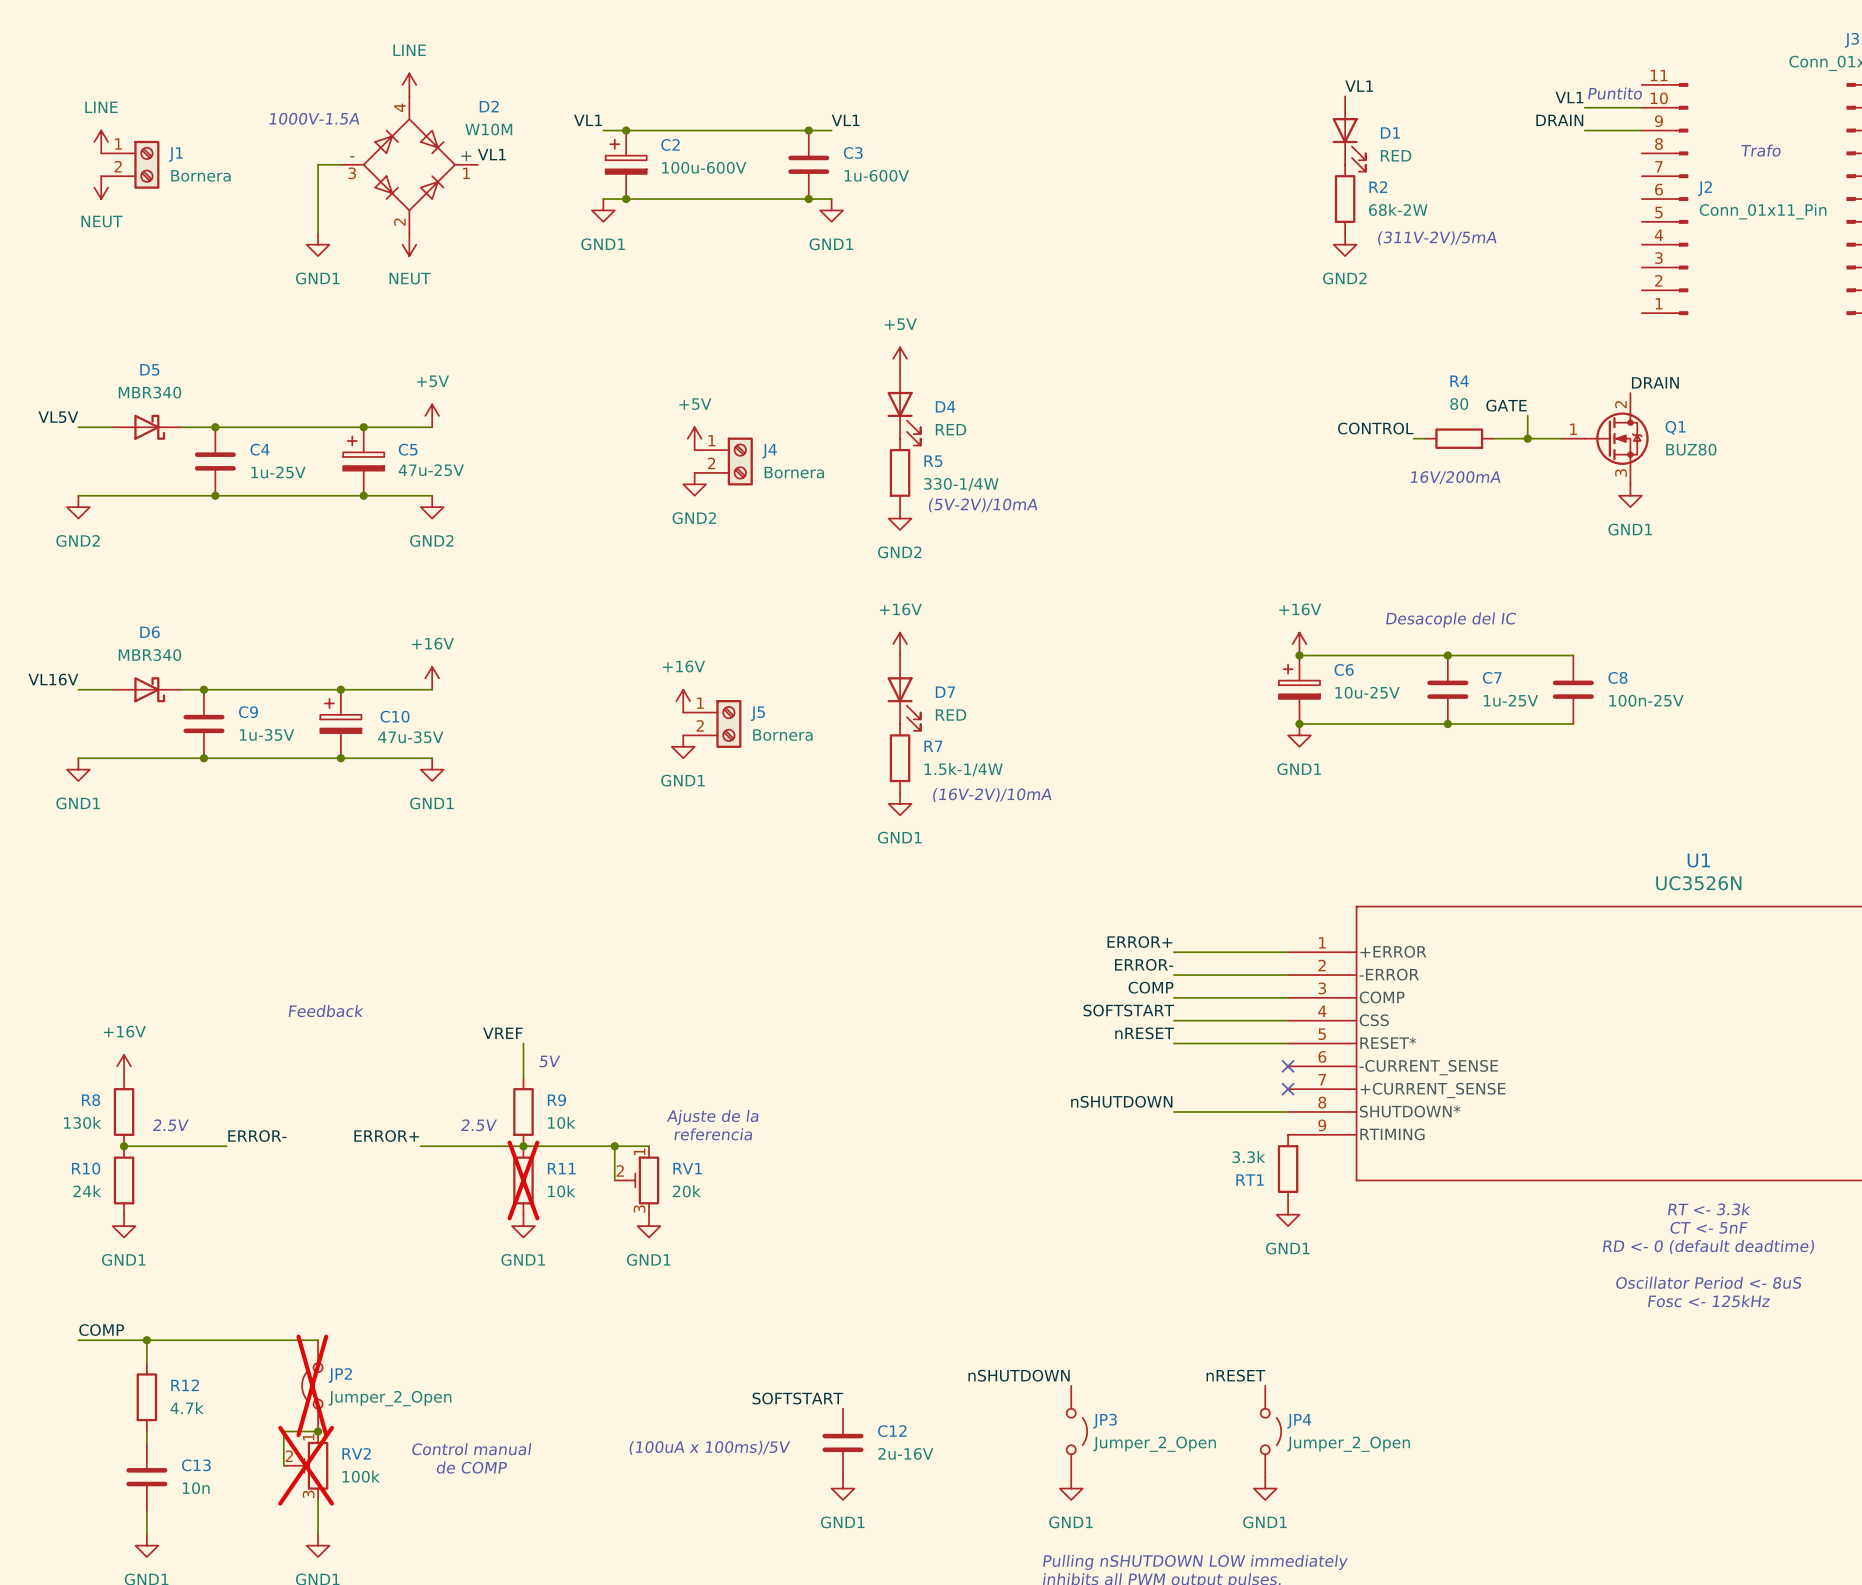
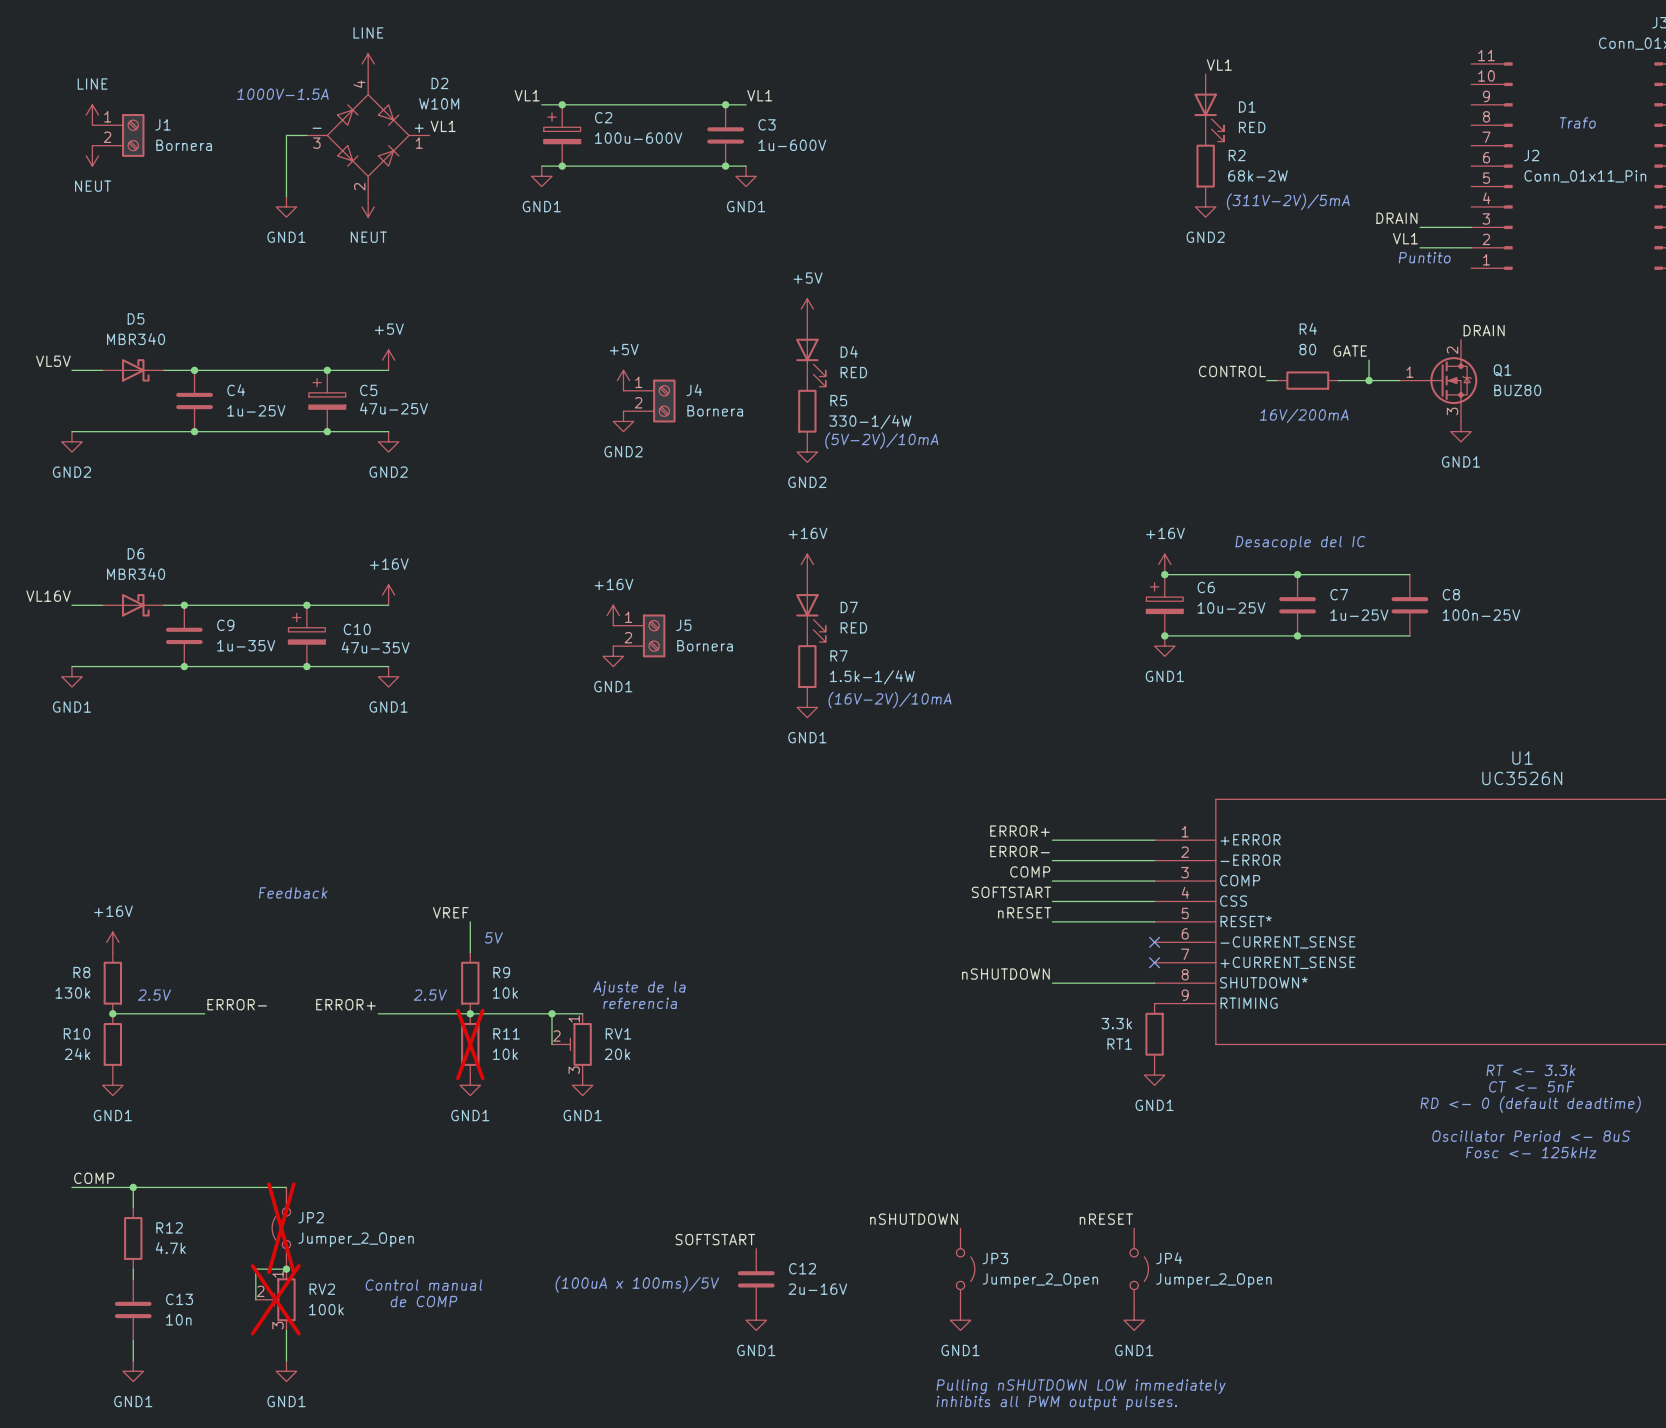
text: Puntito (1615, 93) -> none
label position: VL1 (1569, 97) -> VL1 (1405, 238)
wire: (1584, 107) (1641, 107) -> (1420, 247) (1471, 247)
label position: DRAIN (1559, 120) -> DRAIN (1396, 218)
wire: (1584, 130) (1641, 130) -> (1420, 227) (1471, 227)
text: none -> Puntito (1424, 257)

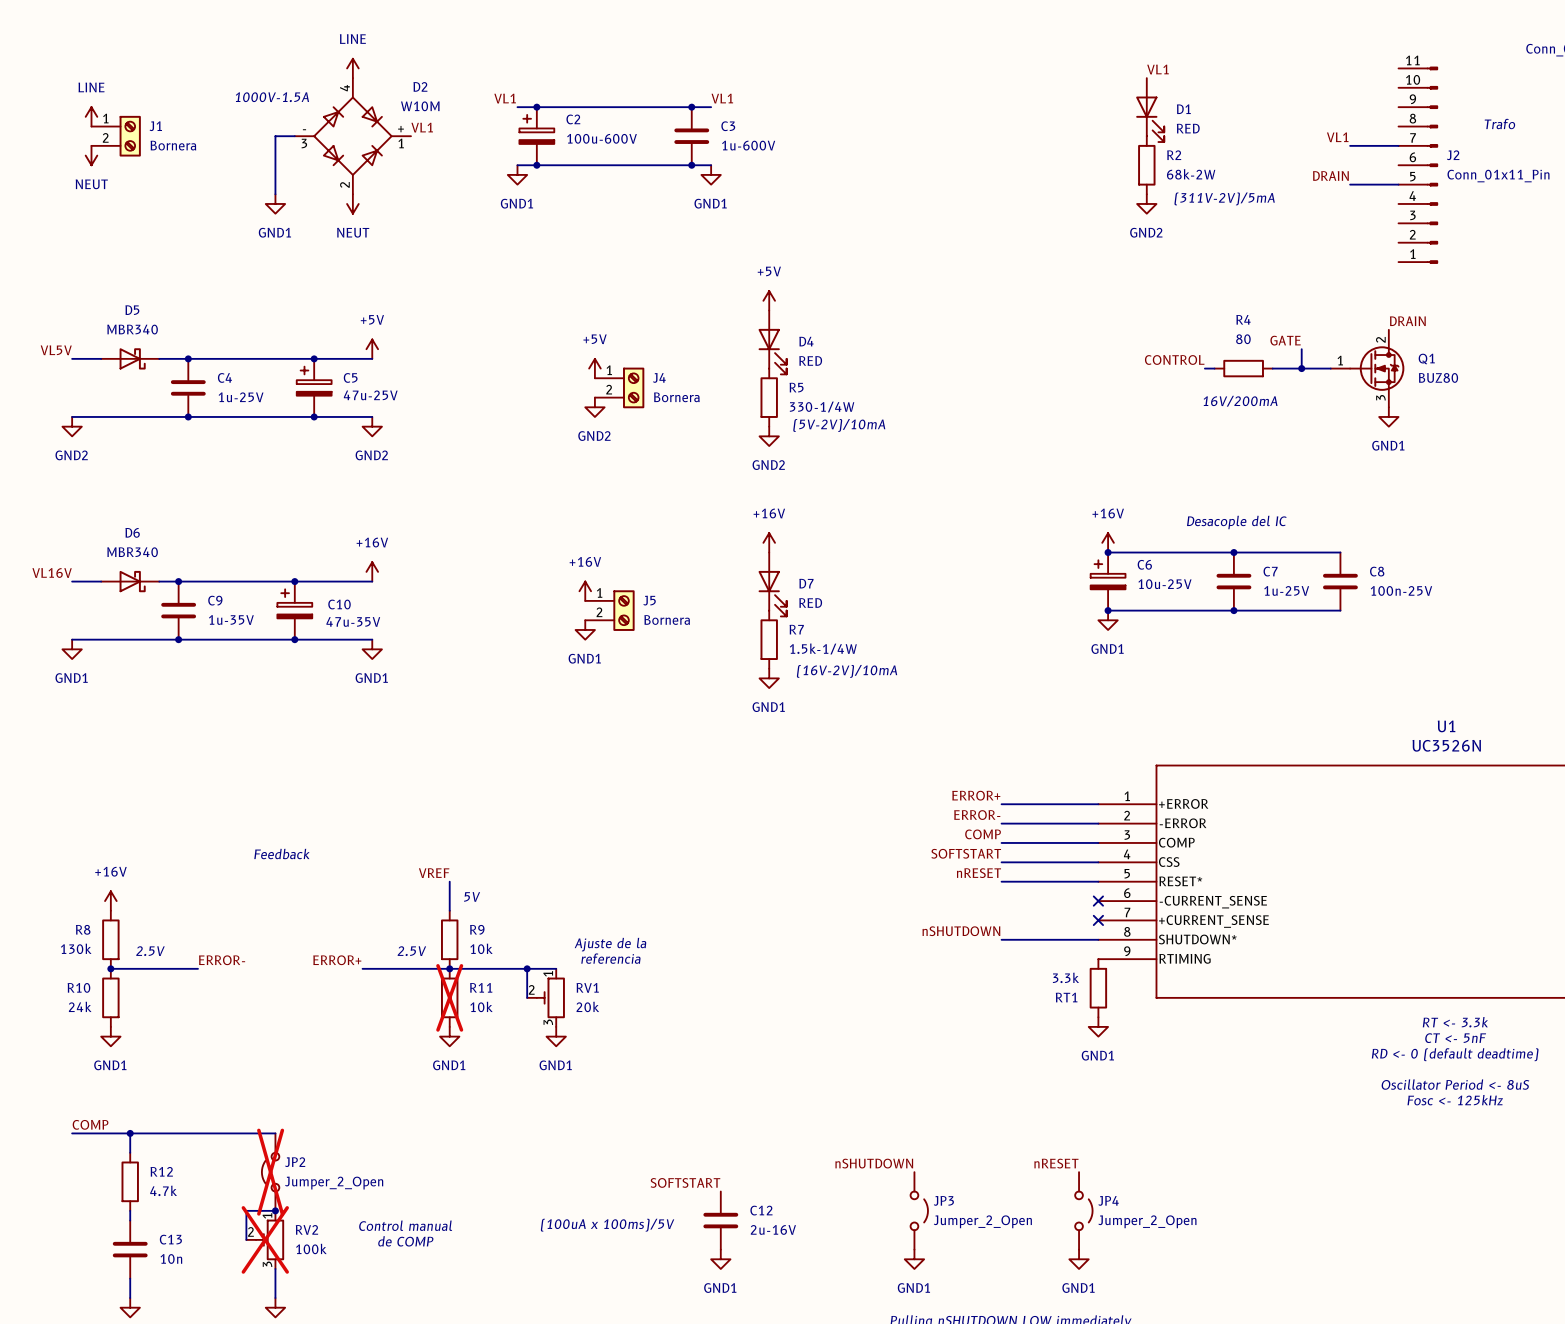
label position: DRAIN (1396, 218) -> DRAIN (1330, 175)
wire: (1420, 227) (1471, 227) -> (1350, 184) (1398, 184)
label position: VL1 (1405, 238) -> VL1 (1337, 137)
wire: (1420, 247) (1471, 247) -> (1350, 145) (1398, 145)
text: Puntito (1424, 257) -> none

